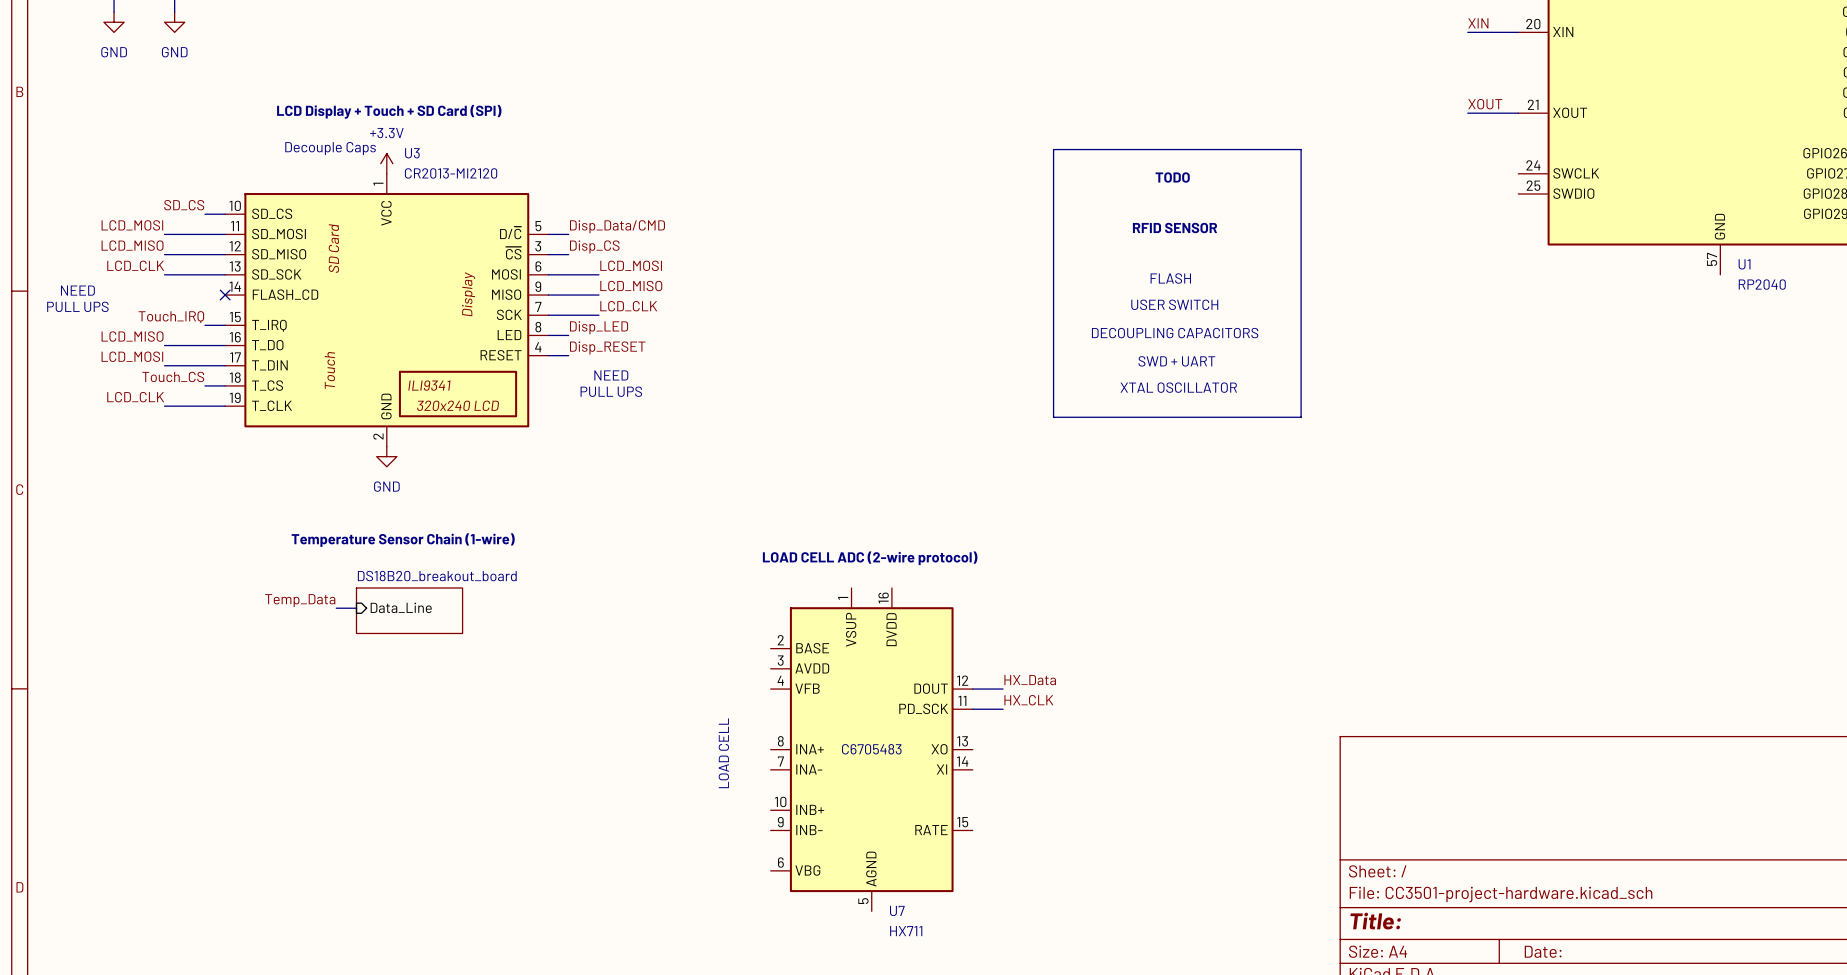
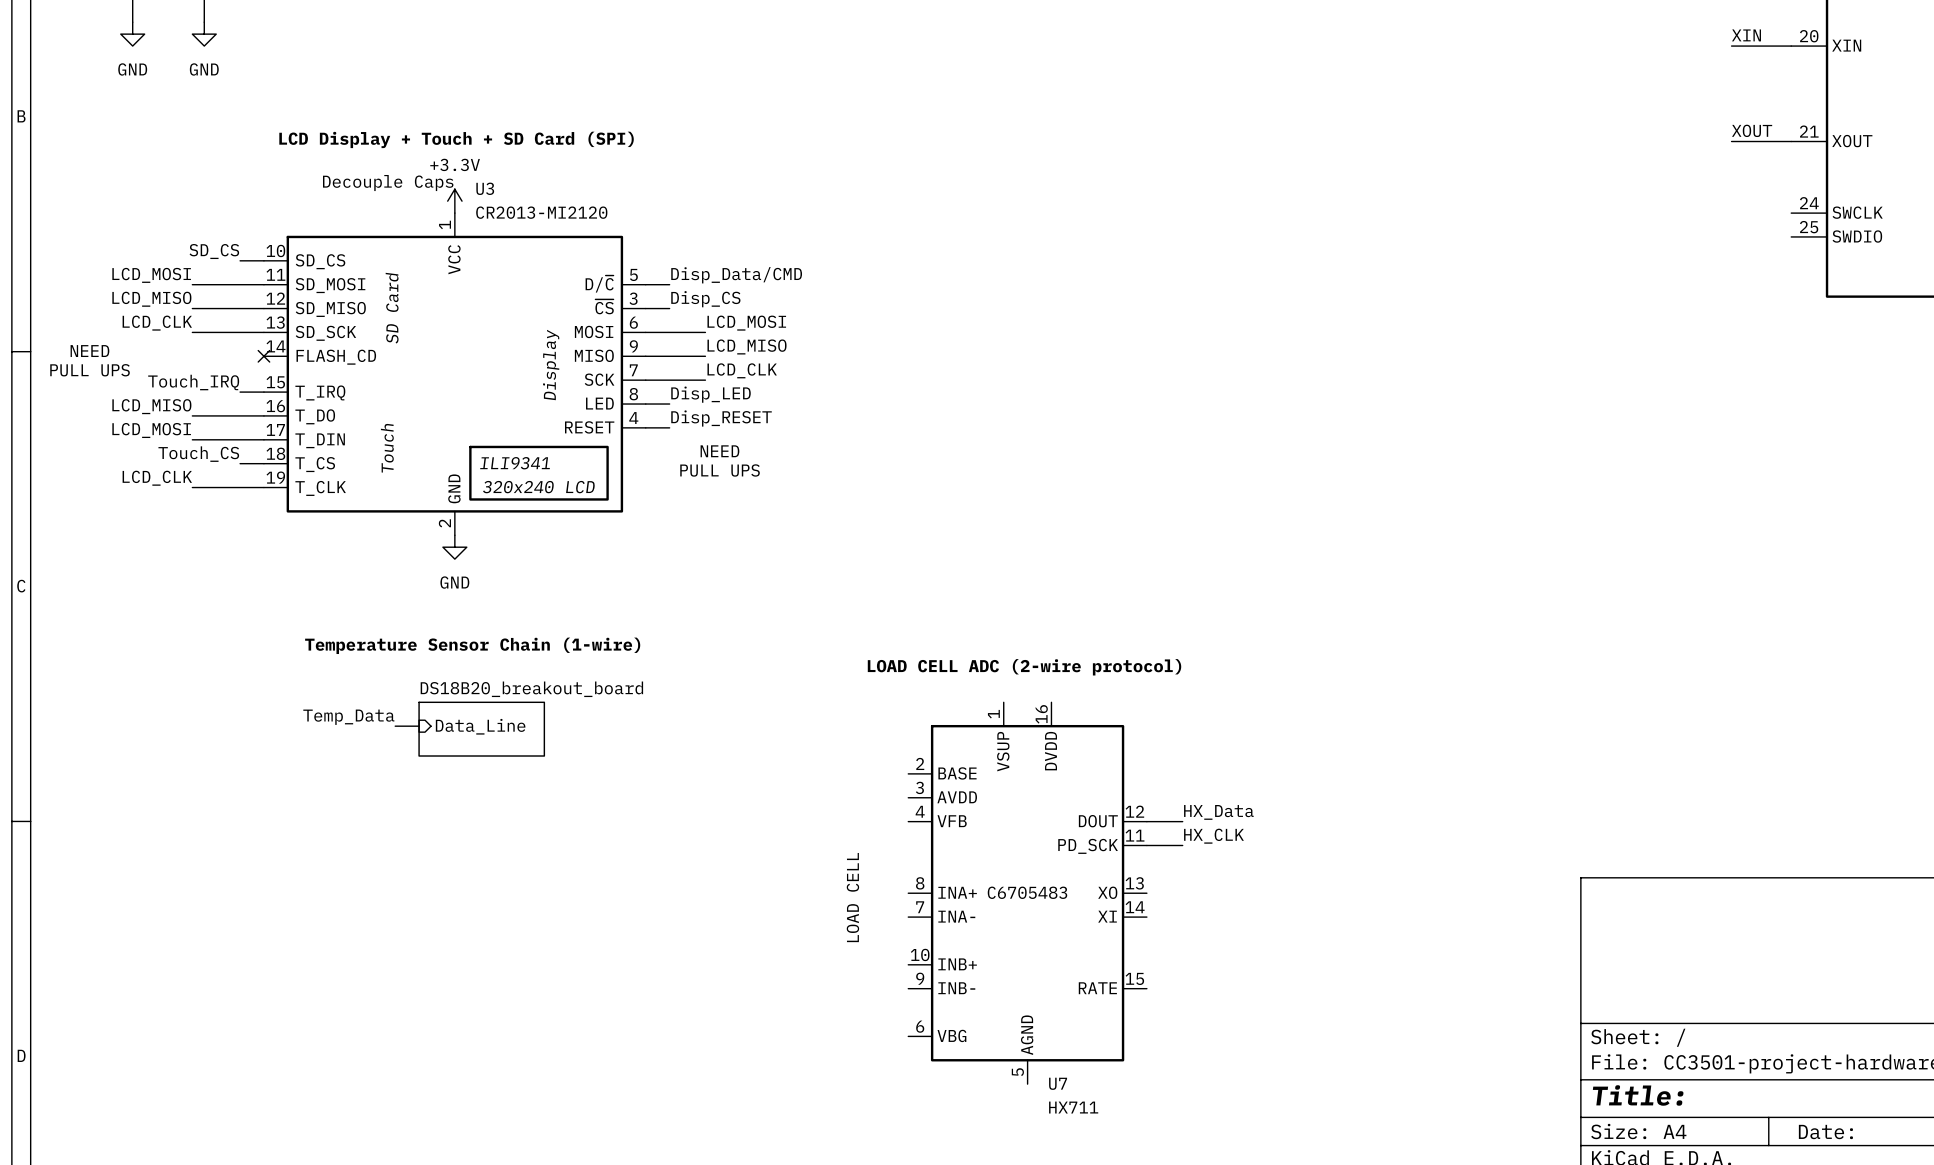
line: (1053, 149) (1301, 149) (1301, 417) (1053, 417) (1053, 149) -> none
text: TODO (1172, 177) -> none
text: RFID SENSOR (1174, 228) -> none
text: FLASH (1170, 278) -> none
text: USER SWITCH (1174, 304) -> none
text: DECOUPLING CAPACITORS (1175, 333) -> none
text: SWD + UART (1176, 361) -> none
text: XTAL OSCILLATOR (1178, 387) -> none

